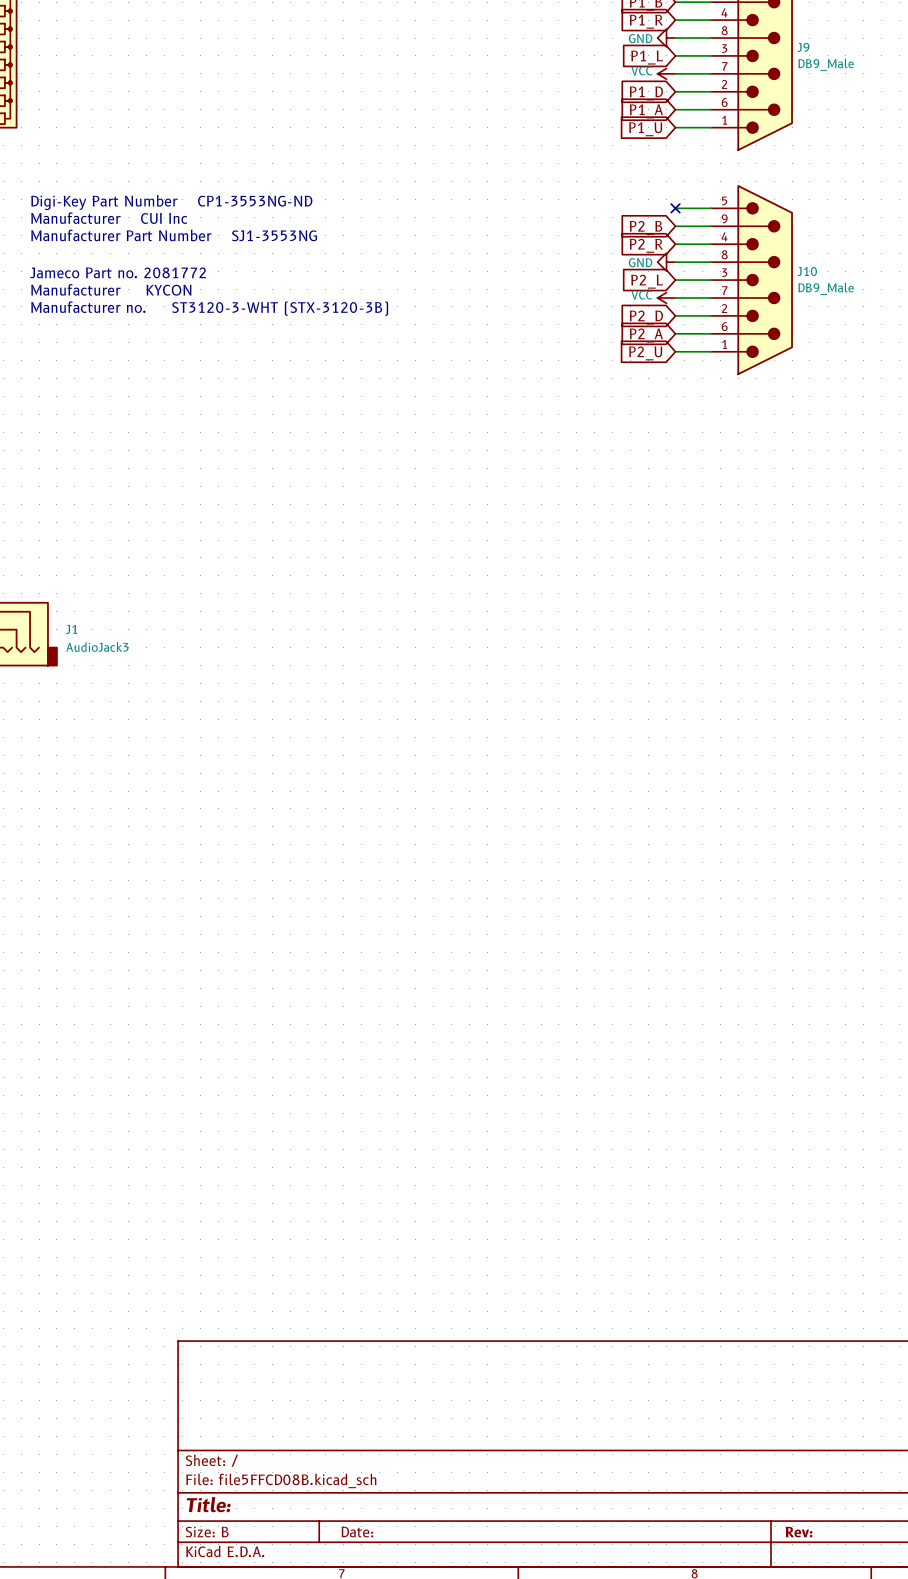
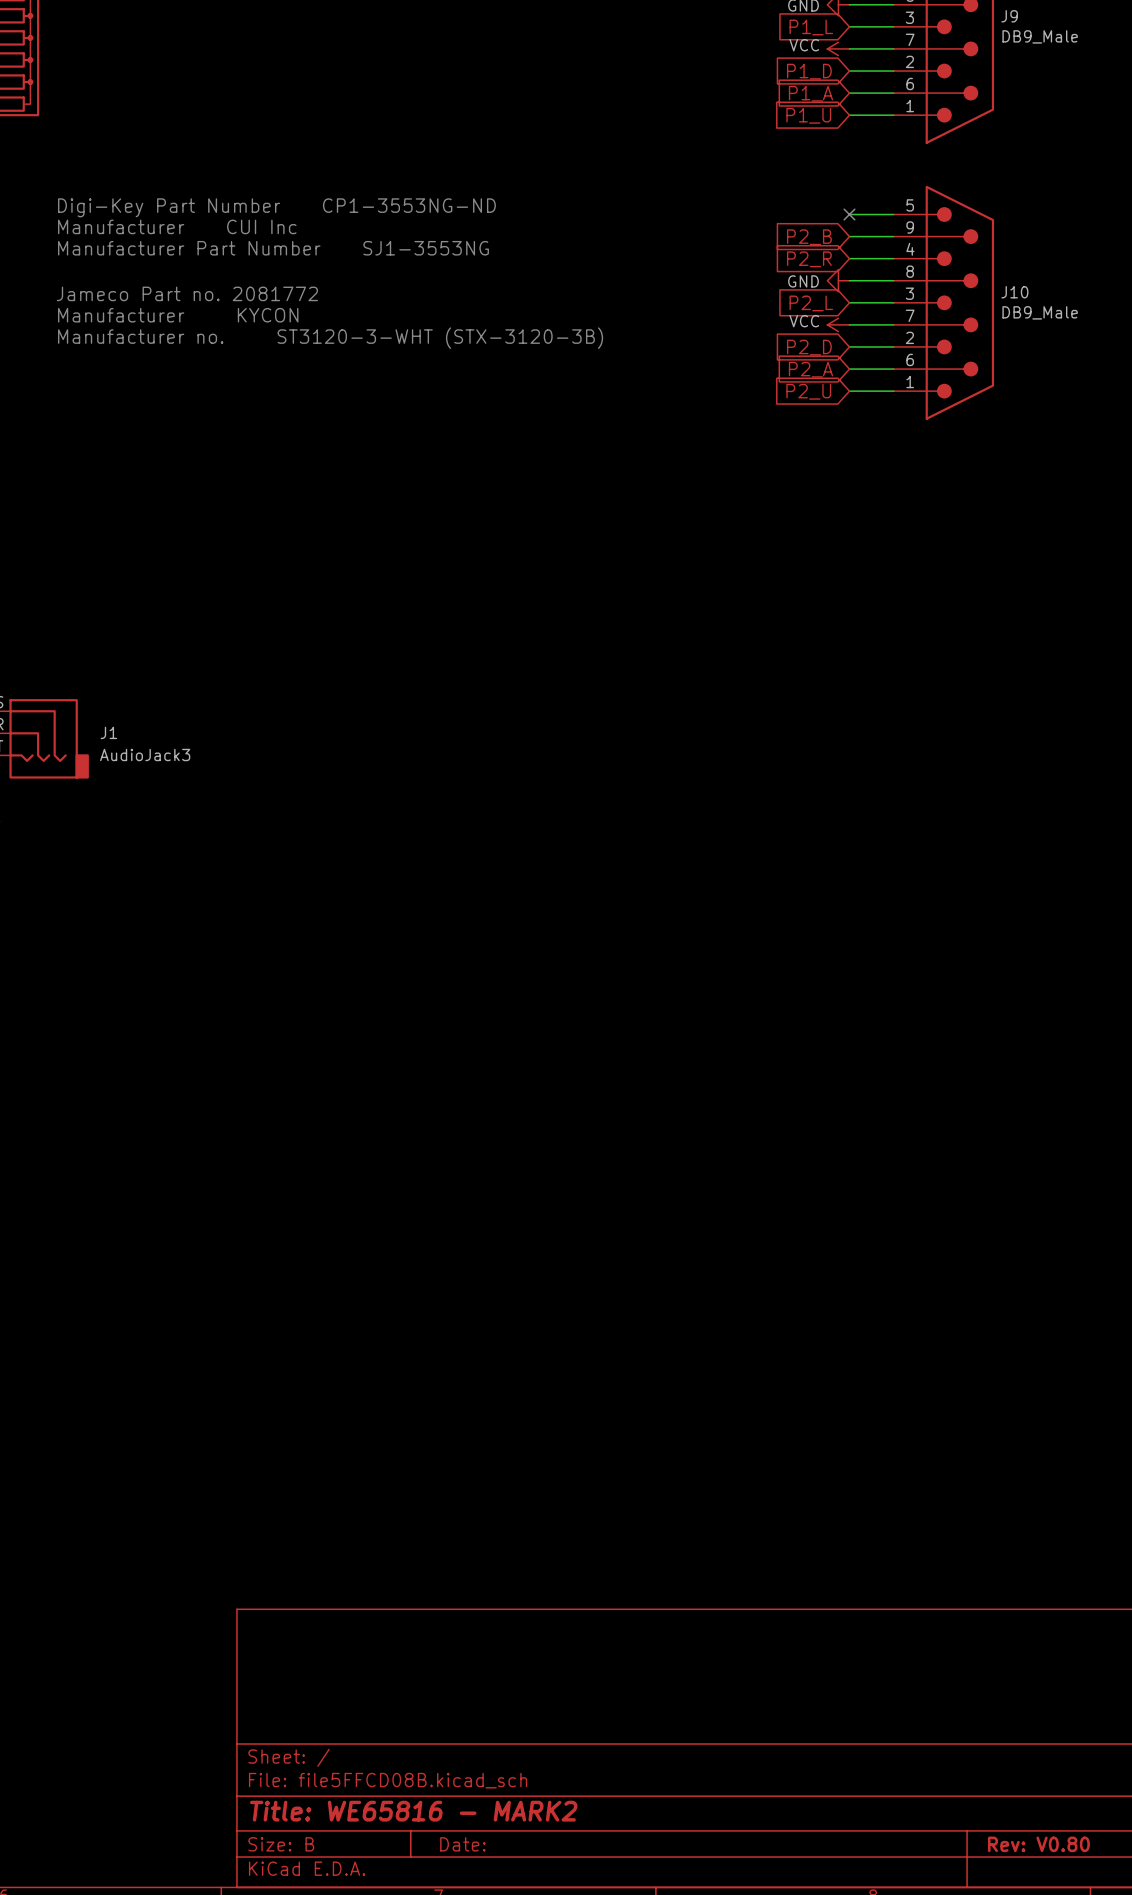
title block: Title: (208, 1504) -> Title: WE65816 - MARK2 (413, 1811)
title block: Rev: (799, 1532) -> Rev: V0.80 (1038, 1844)

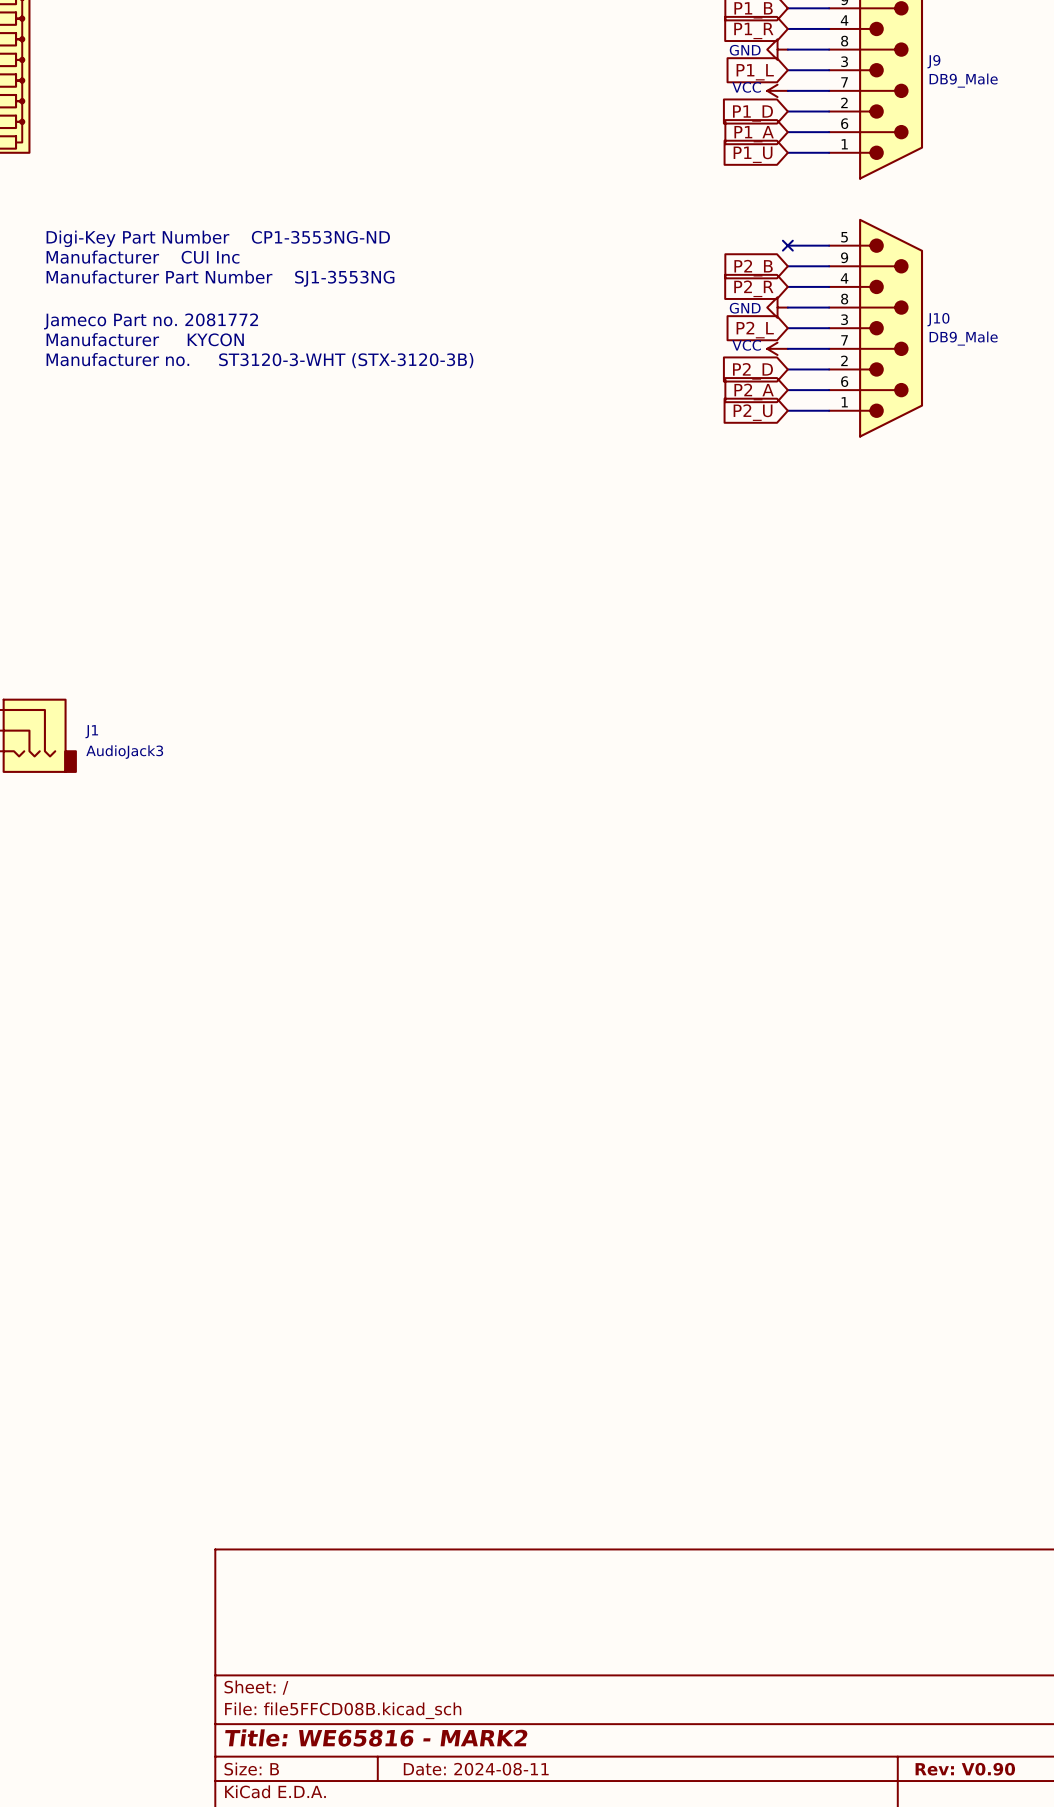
title block: Date: (462, 1844) -> Date: 2024-08-11 (476, 1769)
title block: Rev: V0.80 (1038, 1844) -> Rev: V0.90 (965, 1769)

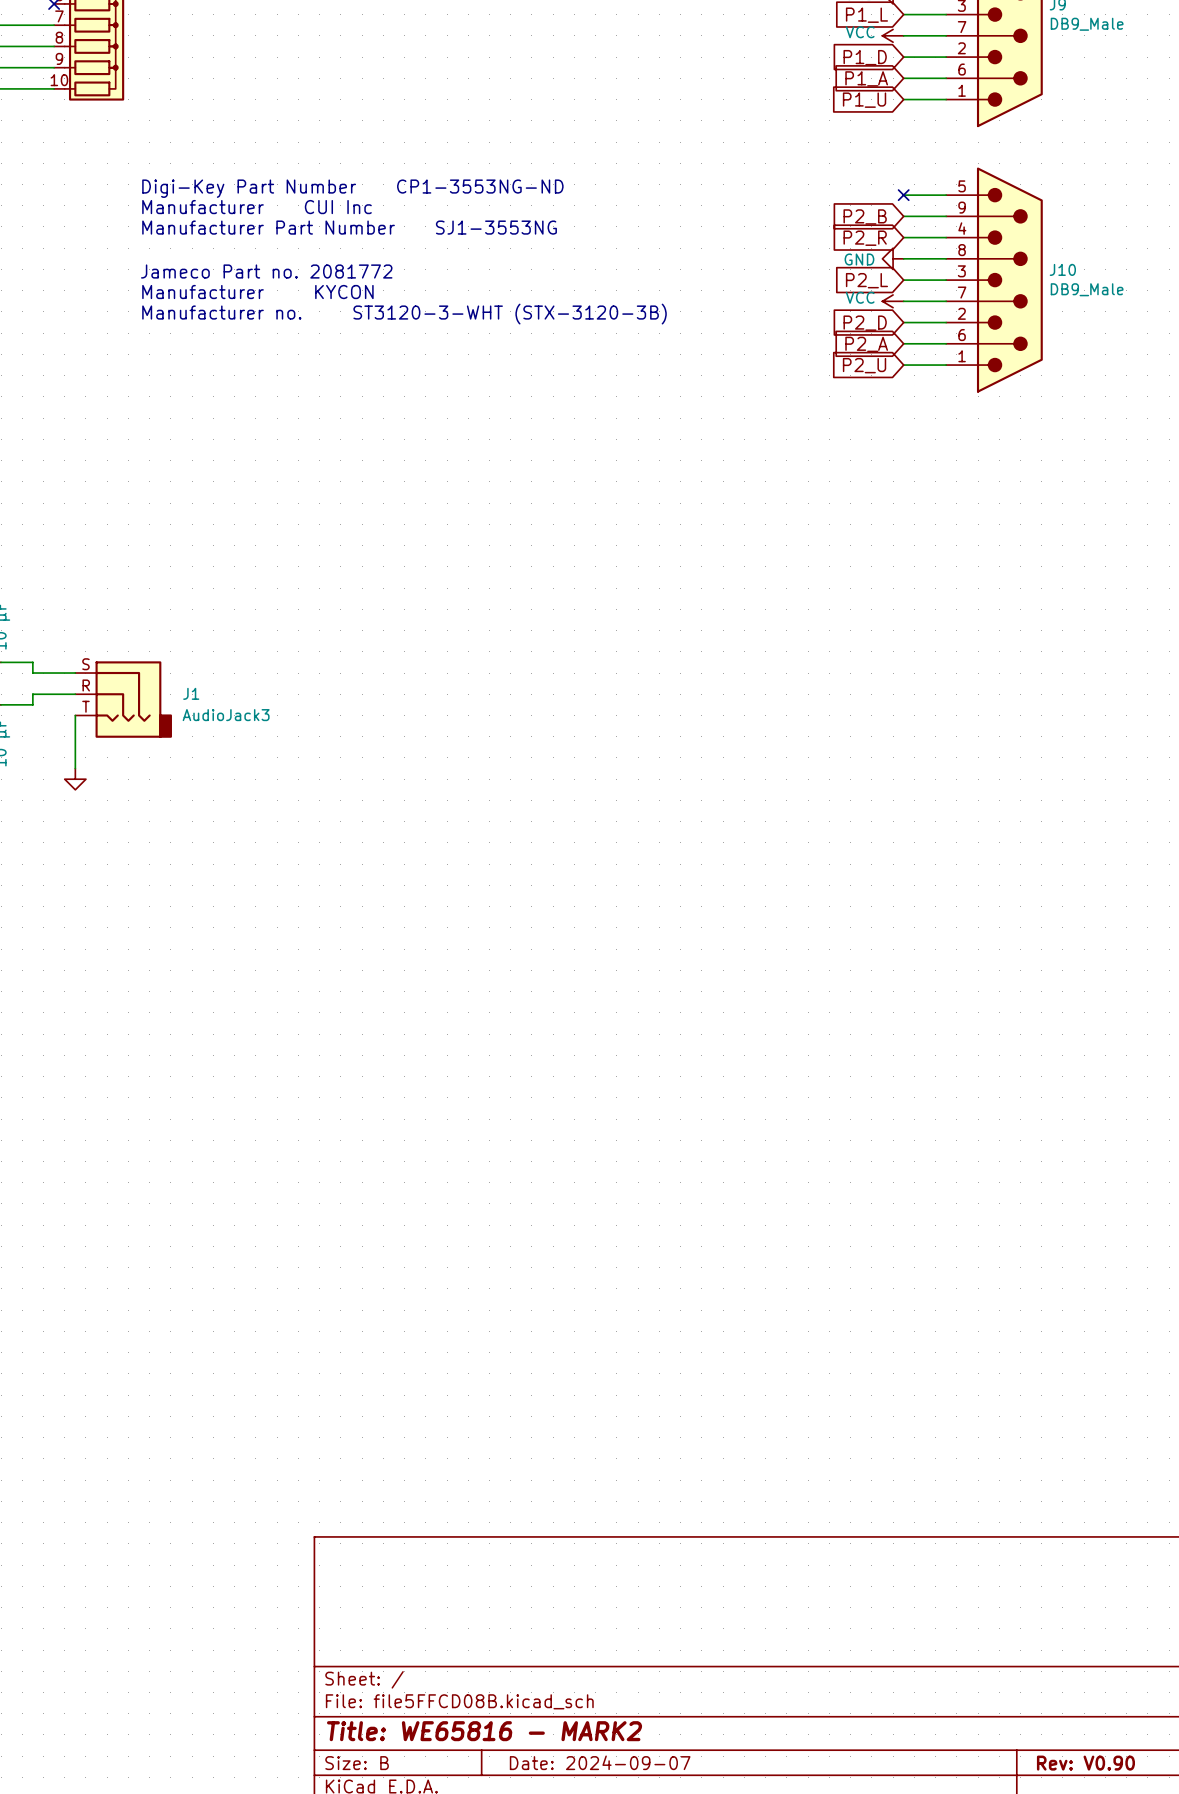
title block: Date: 2024-08-11 (476, 1769) -> Date: 2024-09-07 (600, 1762)

